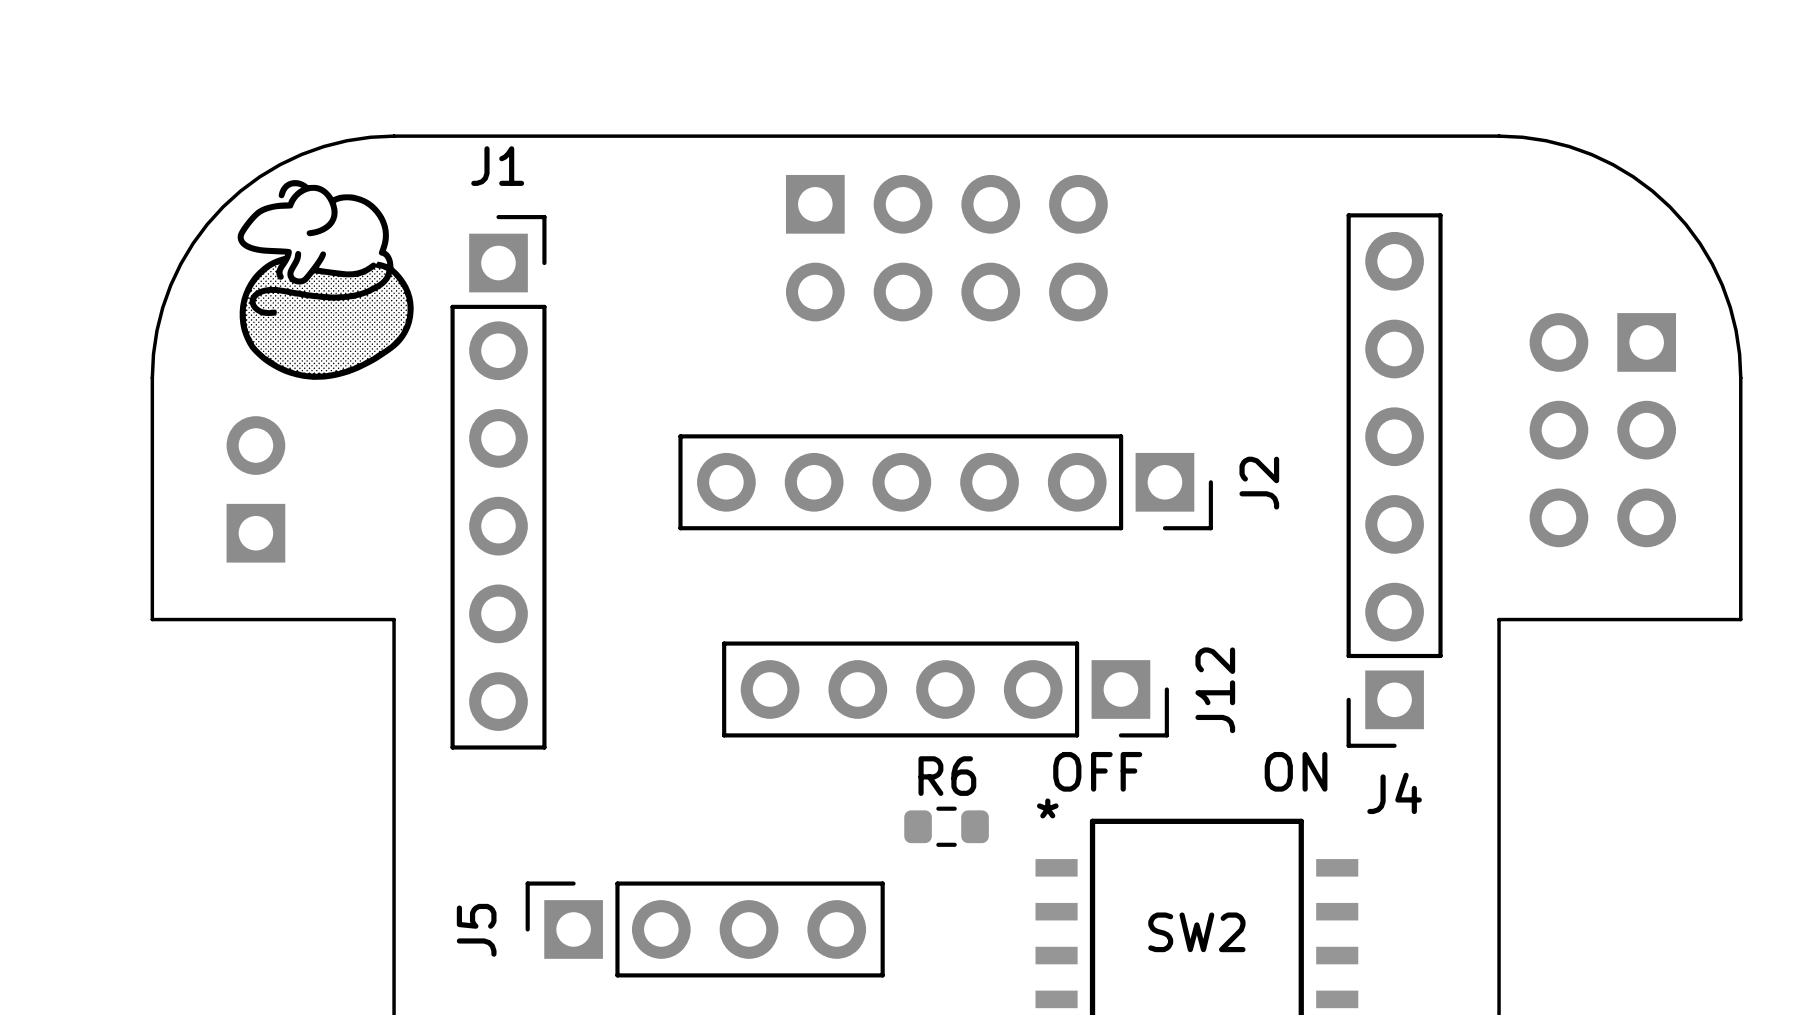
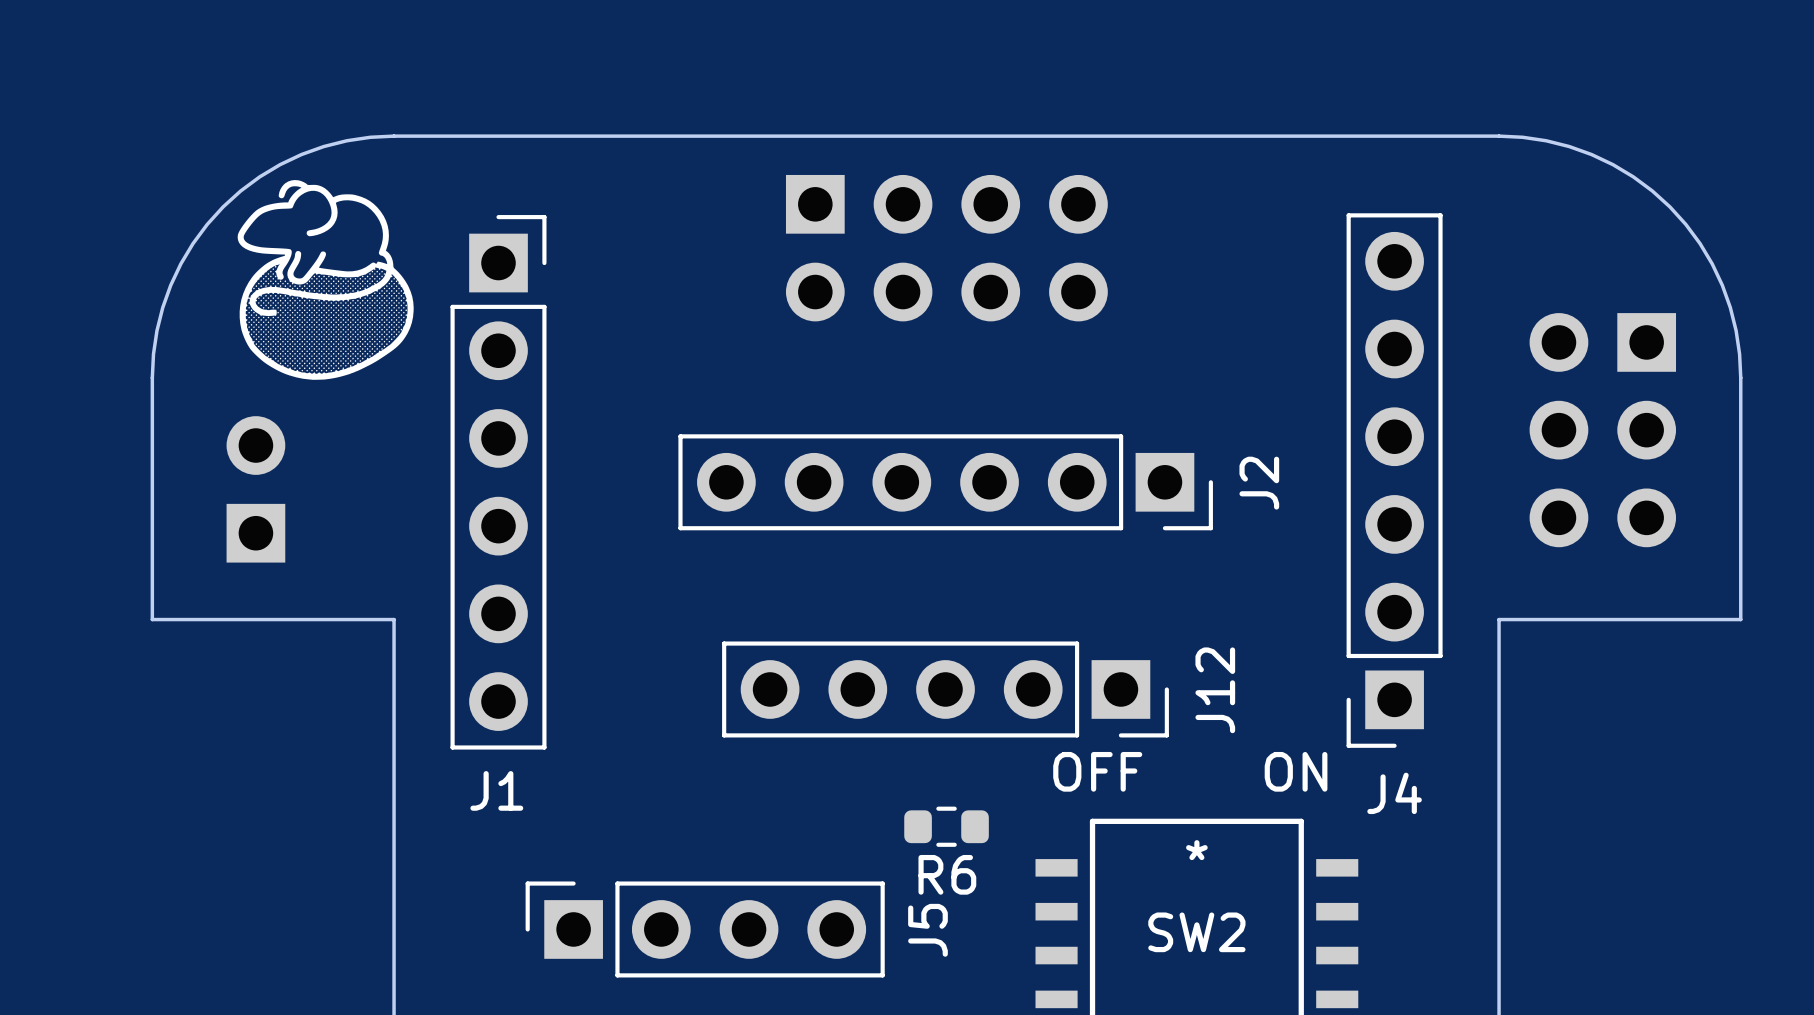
J1 name position: J1 (497, 166) -> J1 (496, 790)
R6 name position: R6 (947, 776) -> R6 (947, 874)
SW2 text position: * (1047, 808) -> * (1196, 850)
J5 name position: J5 (476, 930) -> J5 (927, 930)

